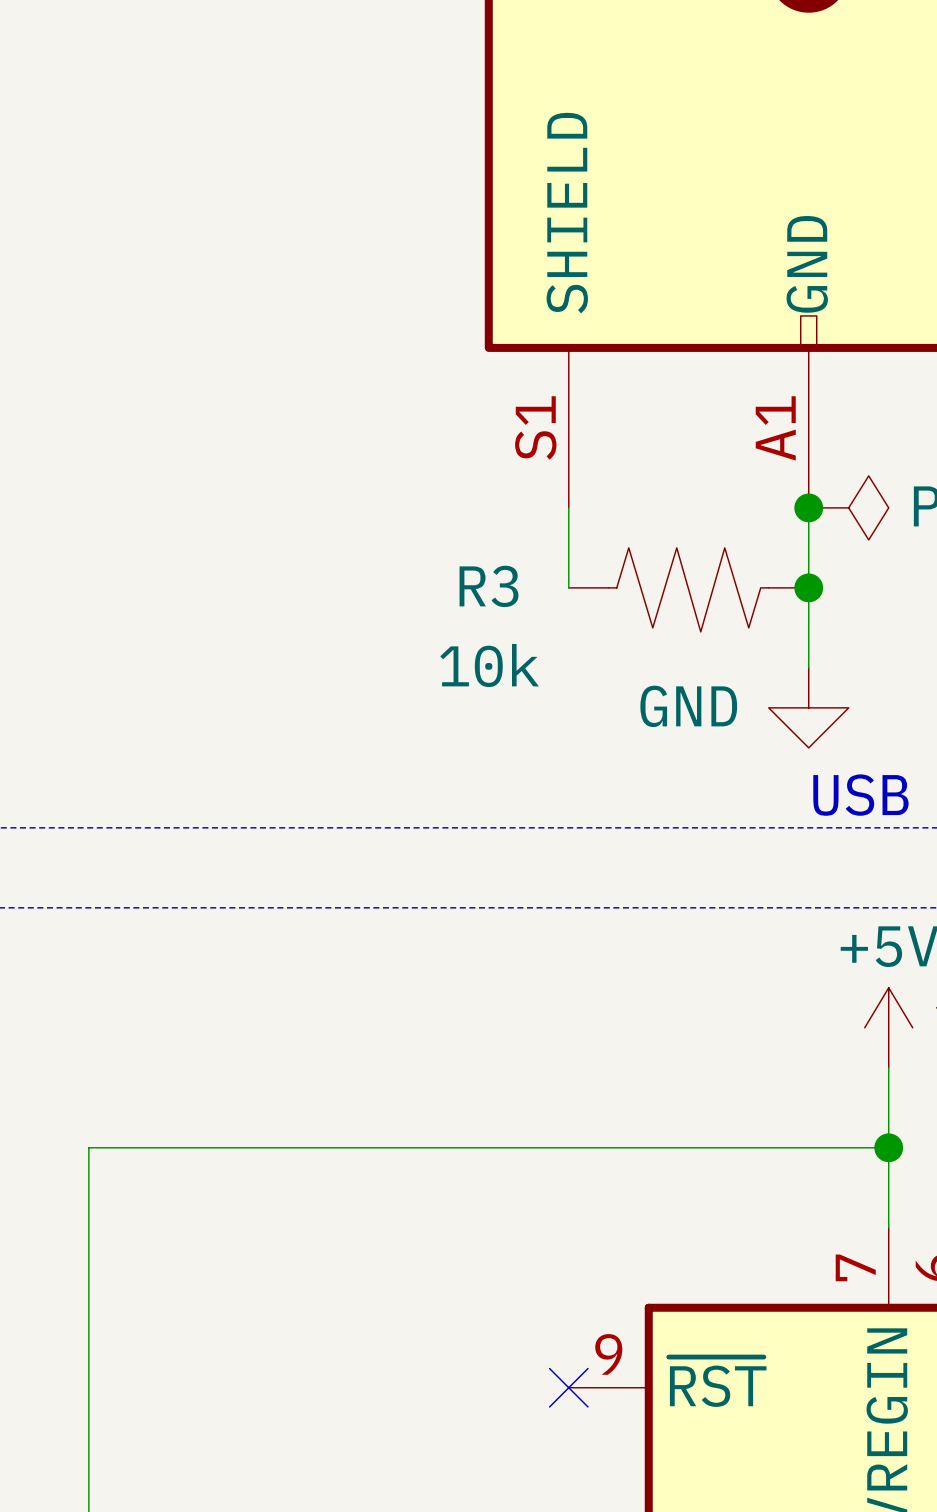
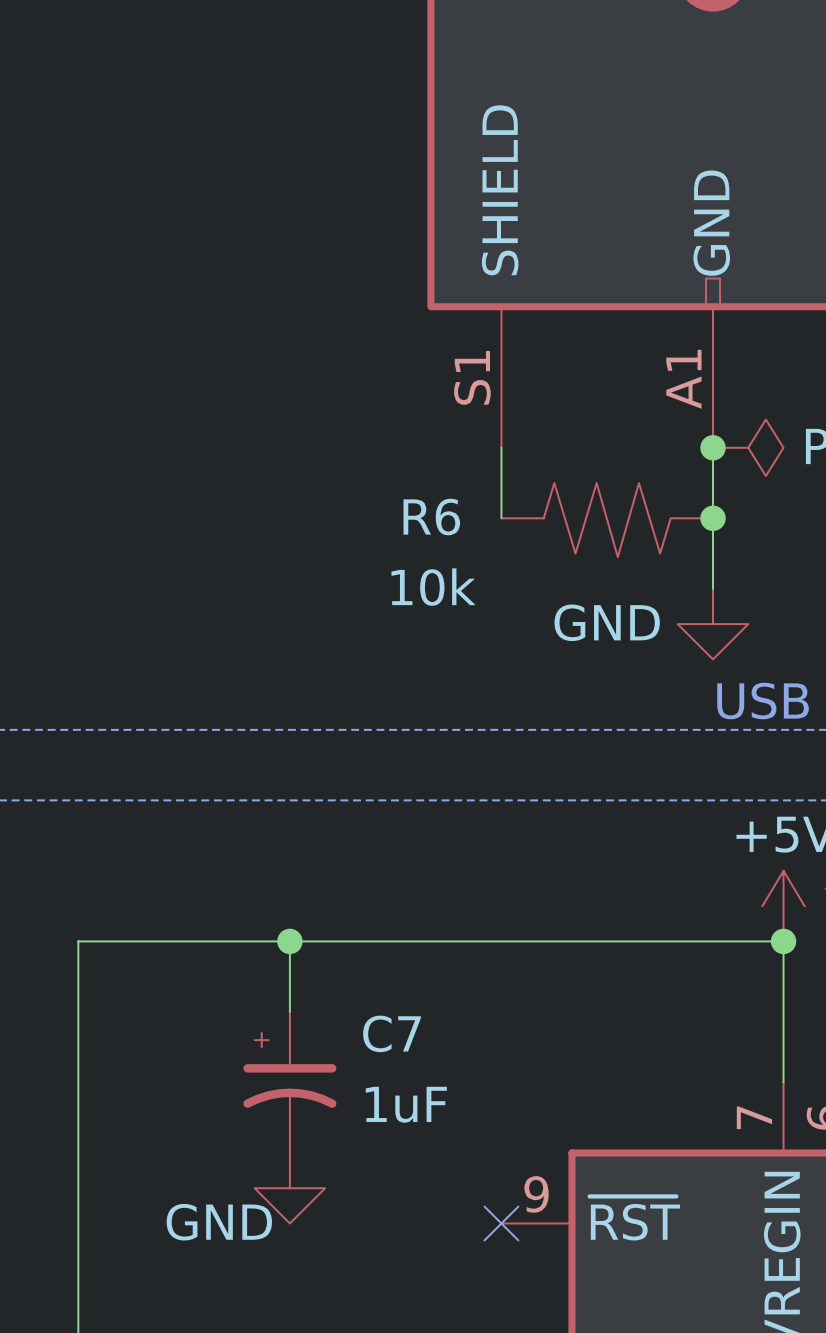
R3 name: R3 (489, 586) -> R6 (431, 517)
wire: none -> (289, 941) (289, 1011)
junction: none -> (289, 941)
wire: (88, 1147) (888, 1147) -> (78, 1011) (78, 941) (783, 941)
junction position: (888, 1147) -> (783, 941)
C7: none -> 1uF (289, 1082)
power symbol: none -> GND (289, 1188)

